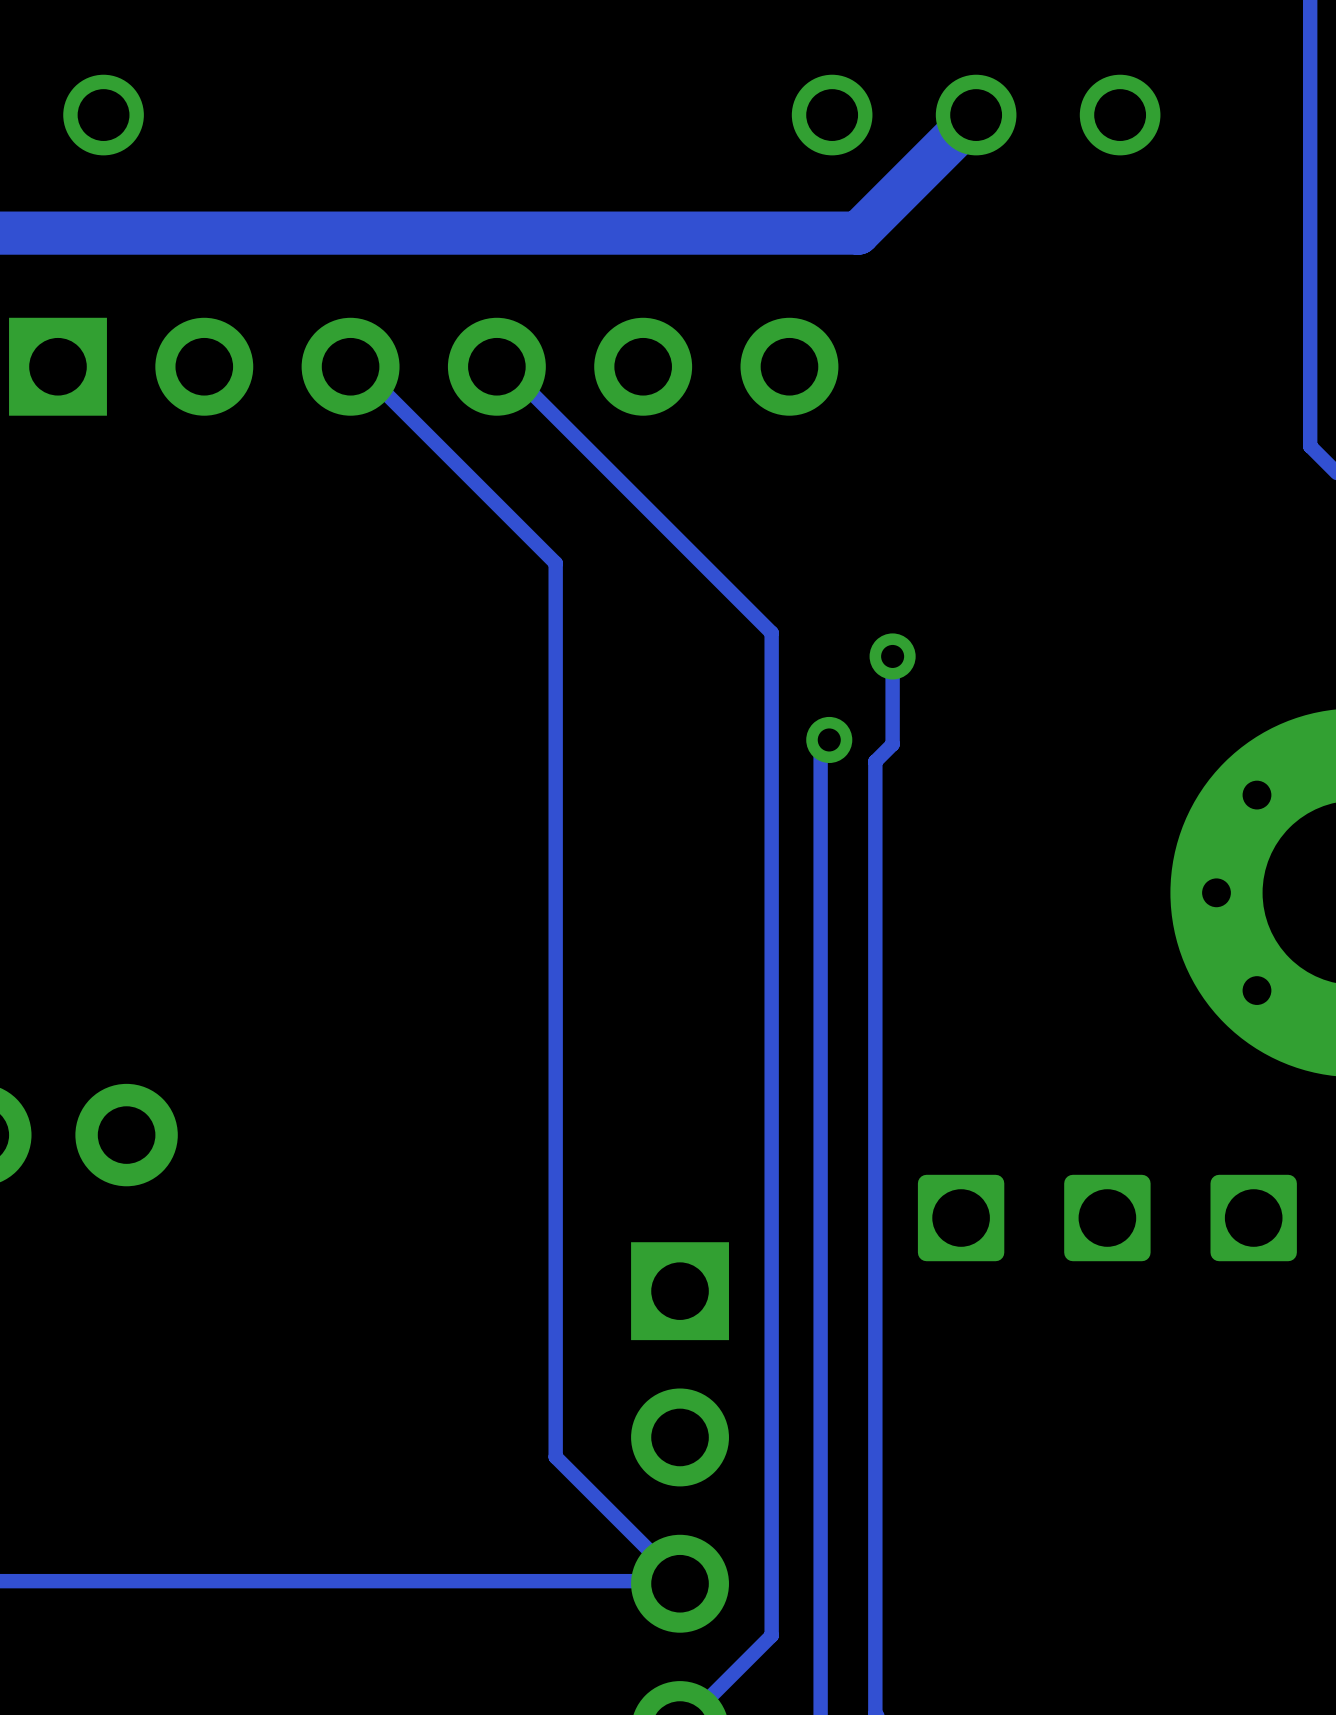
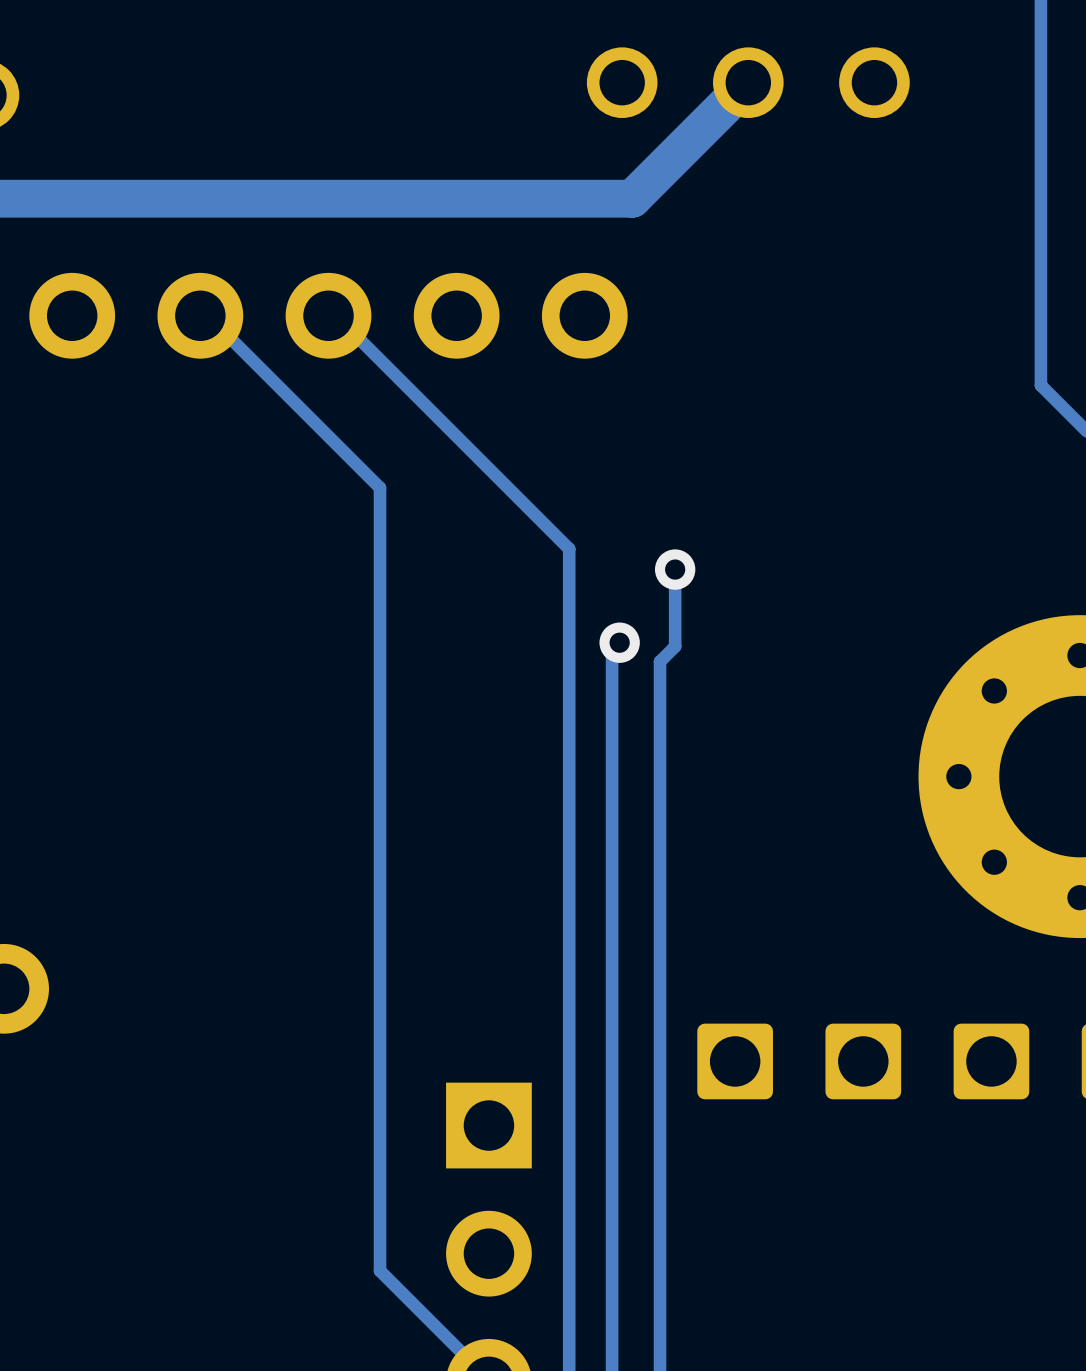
track: (976, 115) (858, 233) (843, 233) -> (748, 82) (632, 198)
part position: (976, 115) -> (748, 82)

